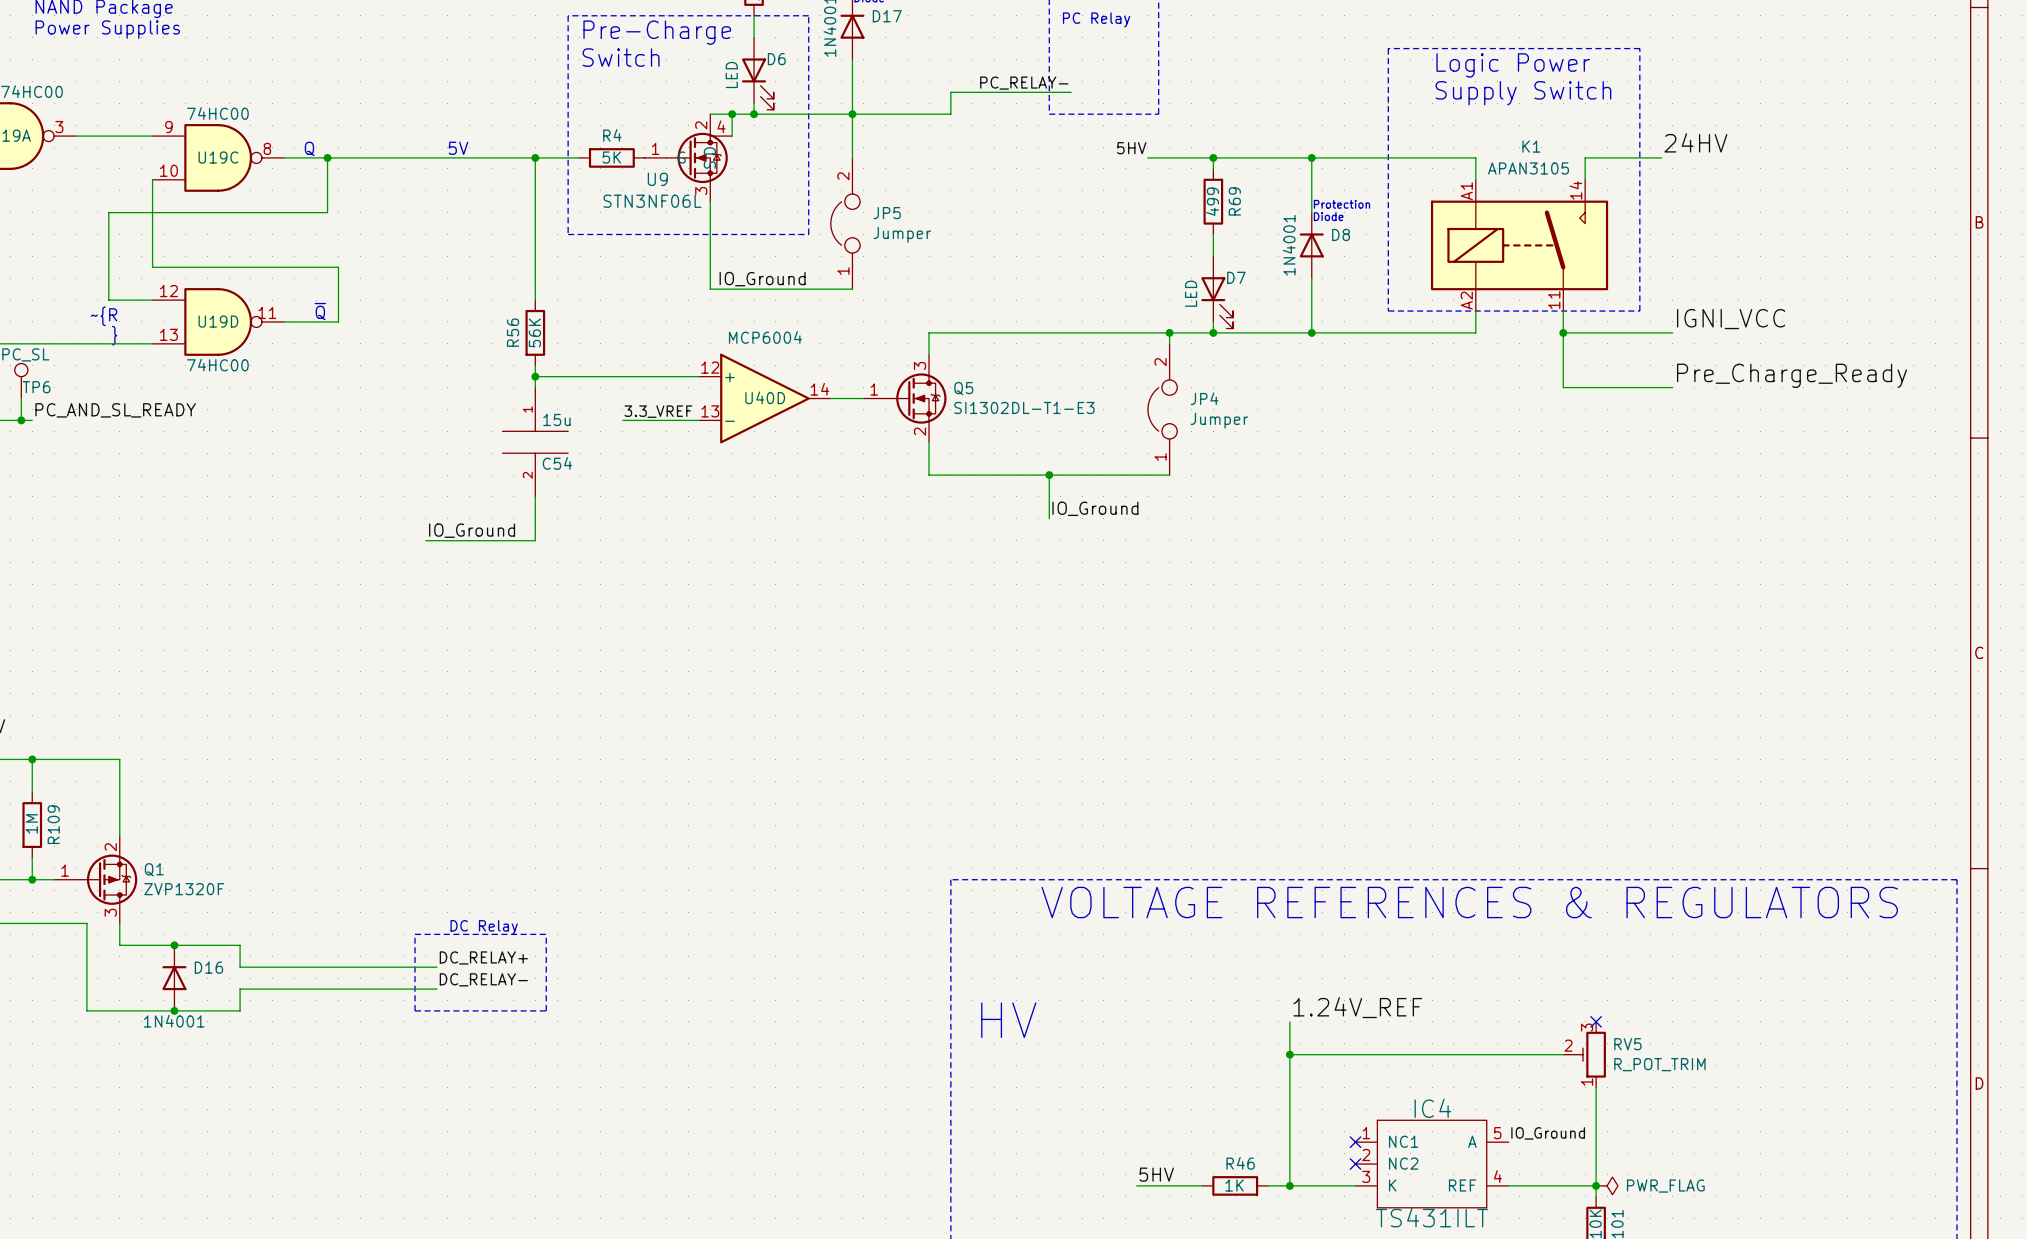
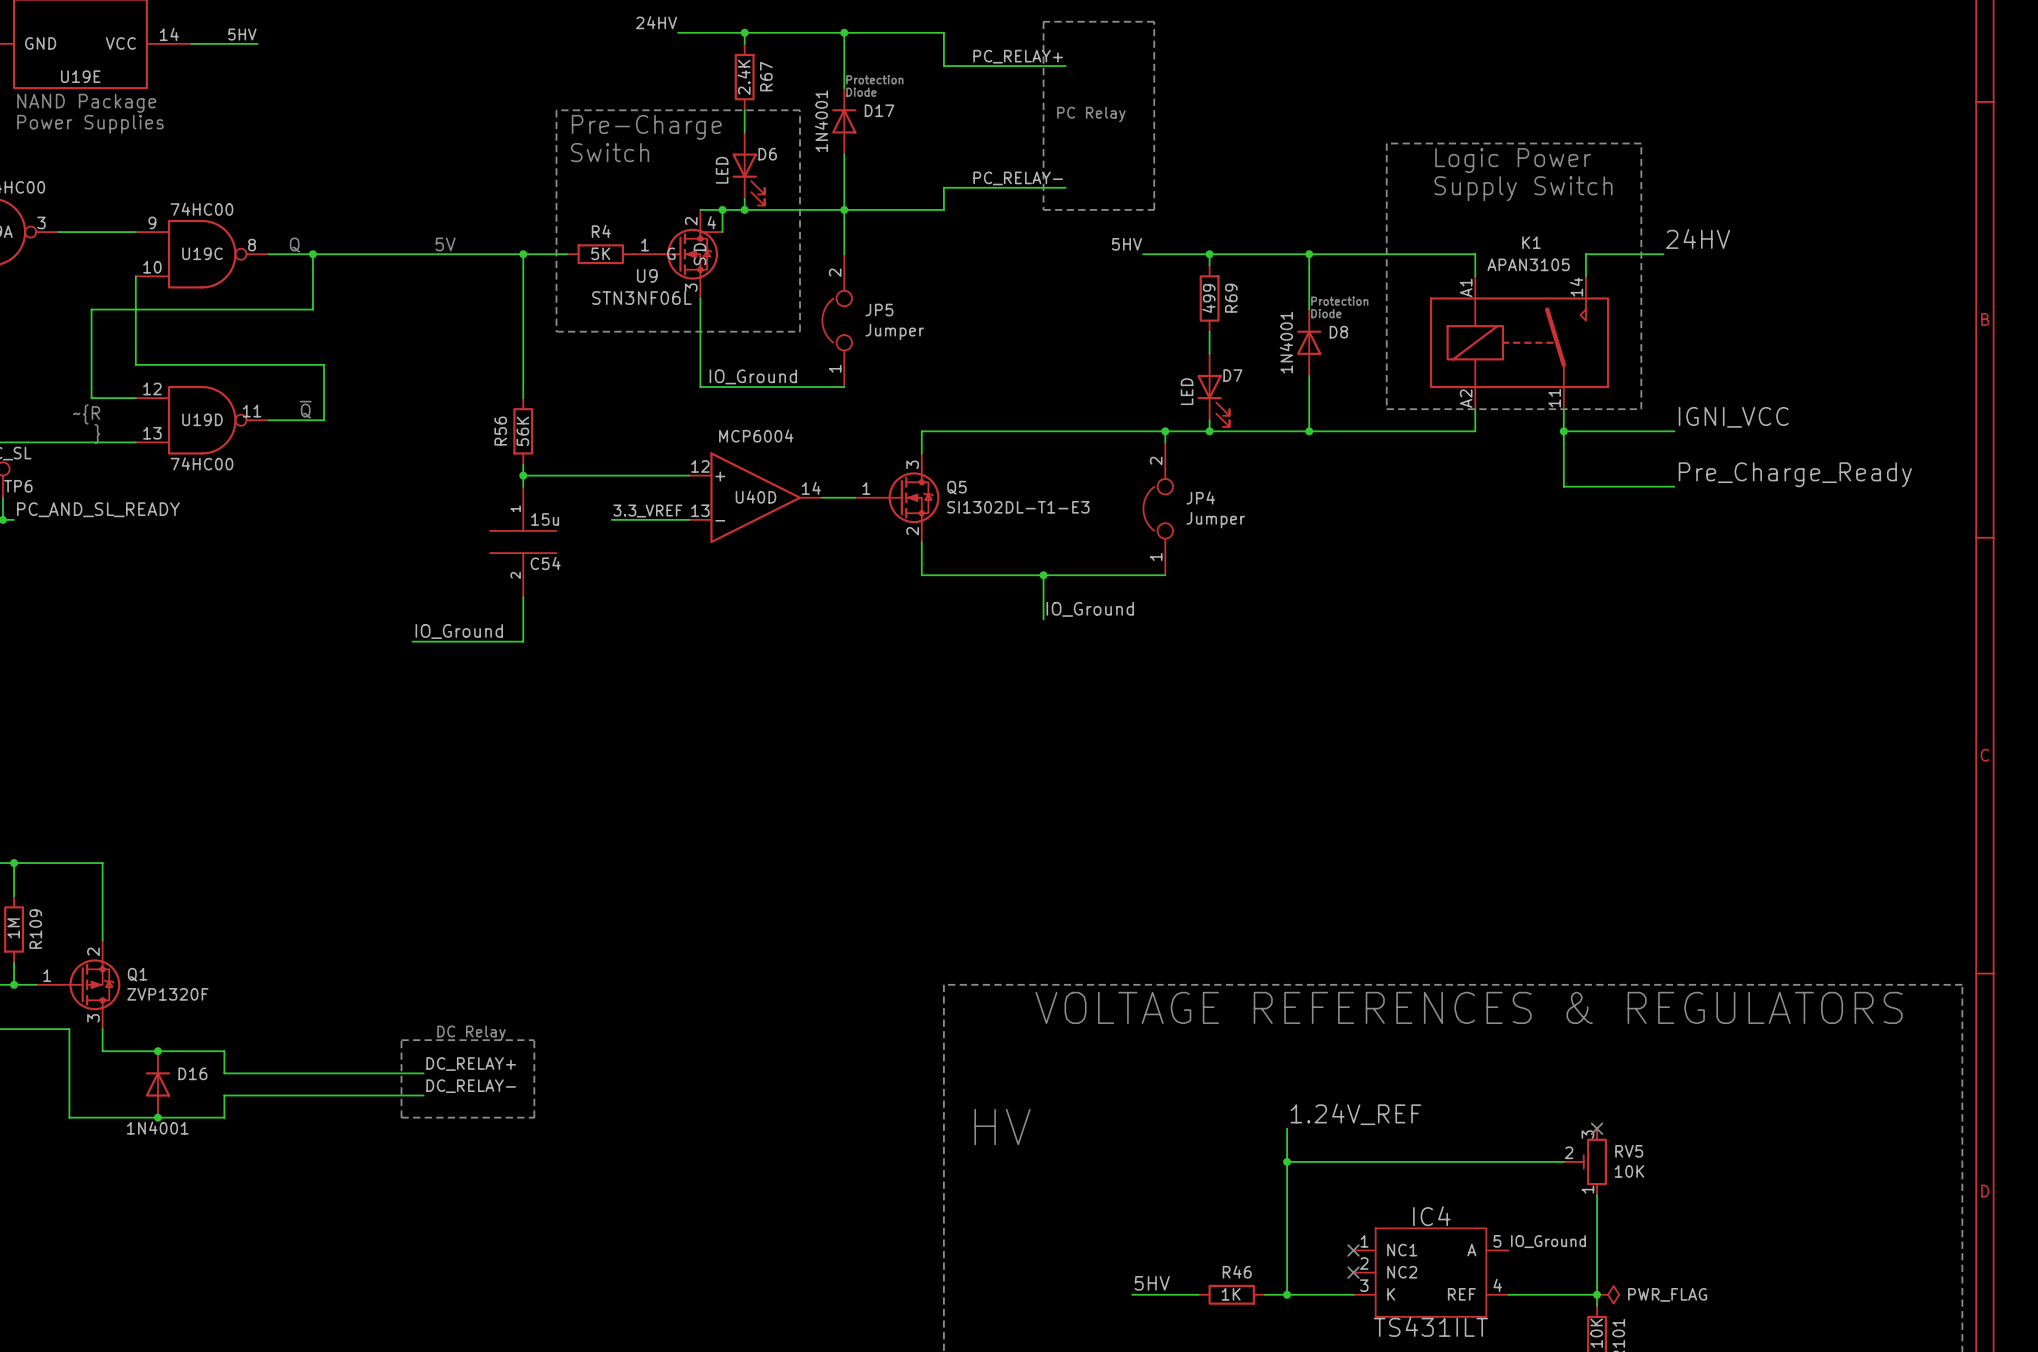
RV5 value: R_POT_TRIM (1659, 1064) -> 10K (1629, 1171)

